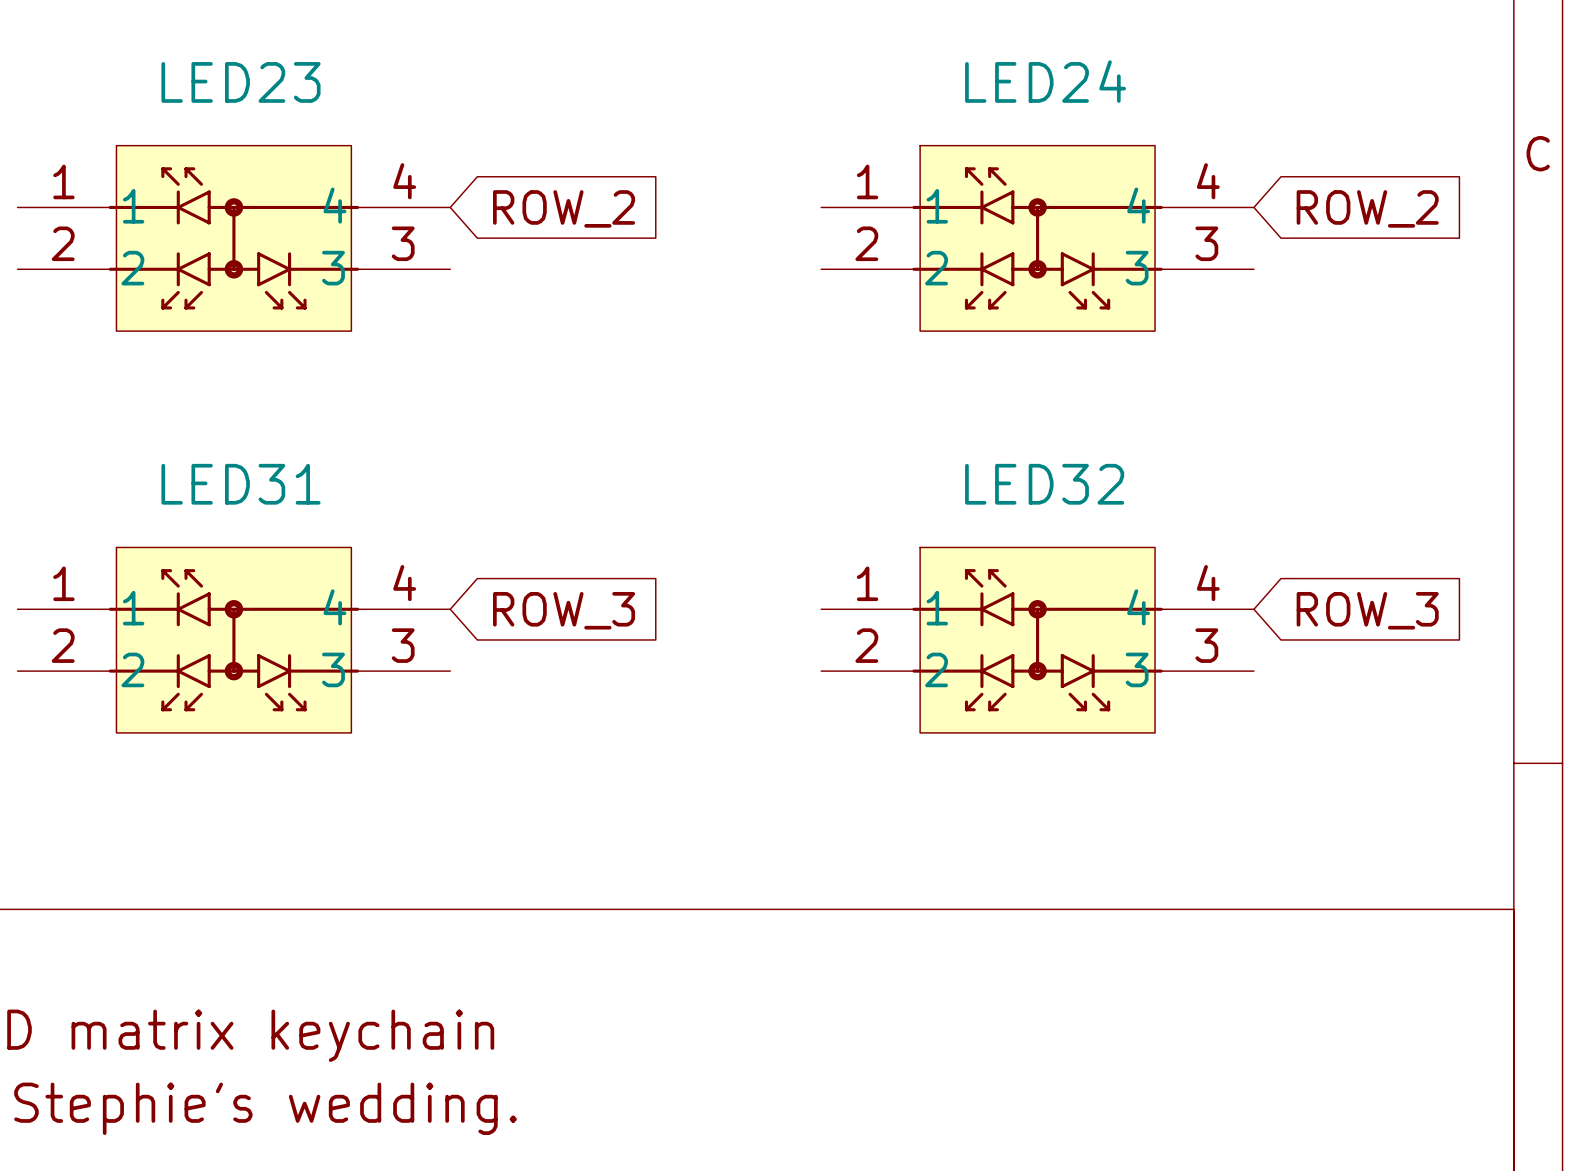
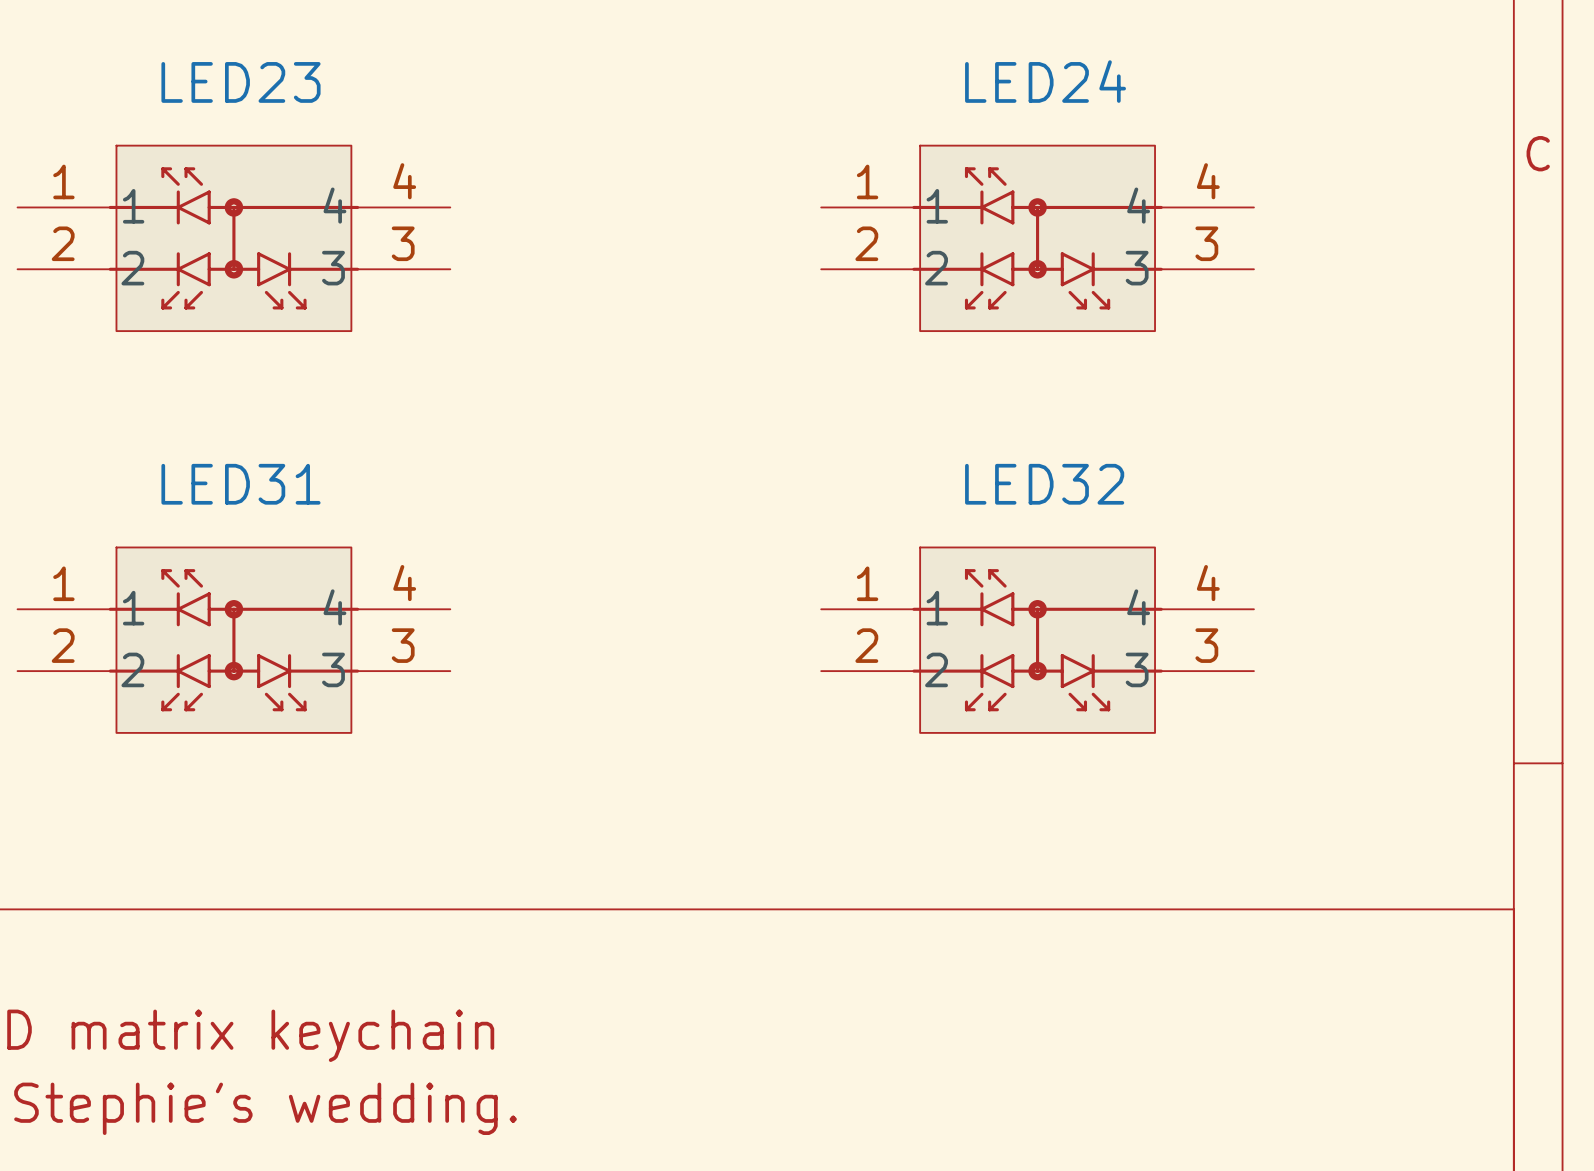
global label: ROW_2 (564, 208) -> none
global label: ROW_2 (1367, 208) -> none
global label: ROW_3 (564, 610) -> none
global label: ROW_3 (1367, 610) -> none

